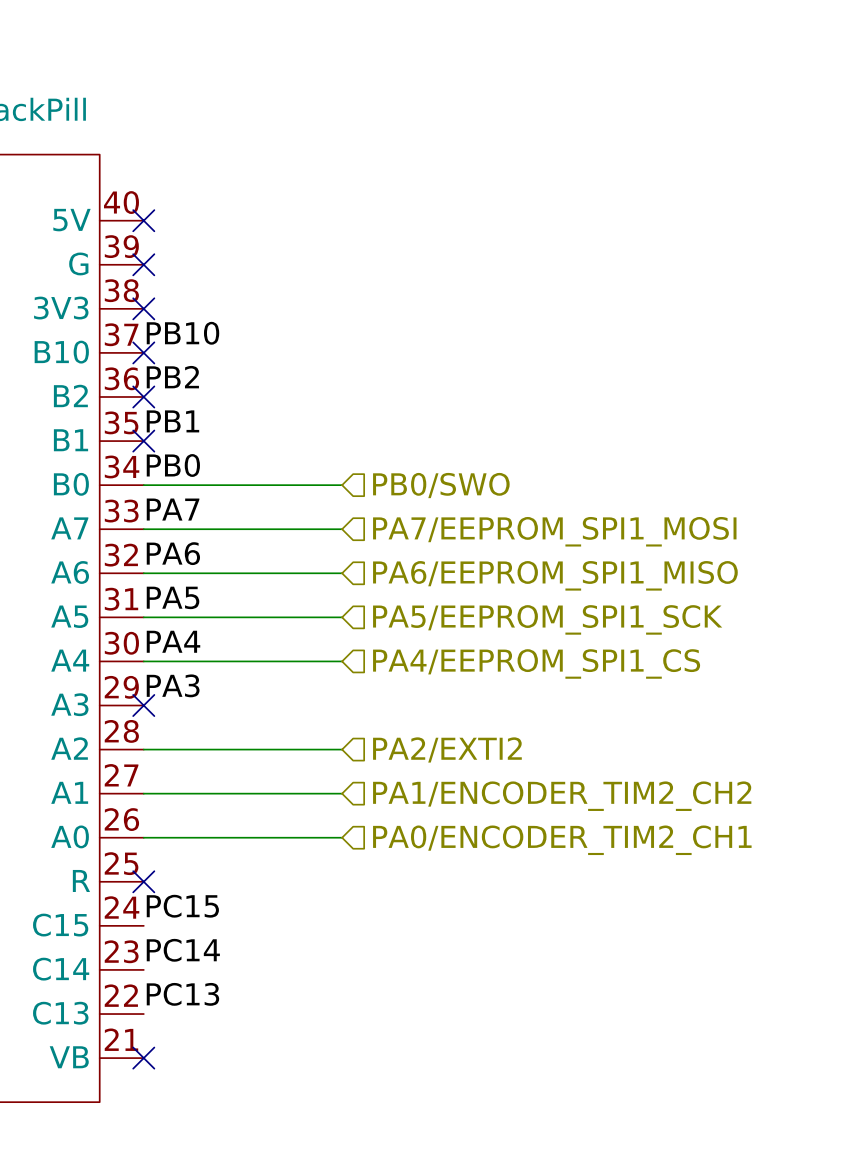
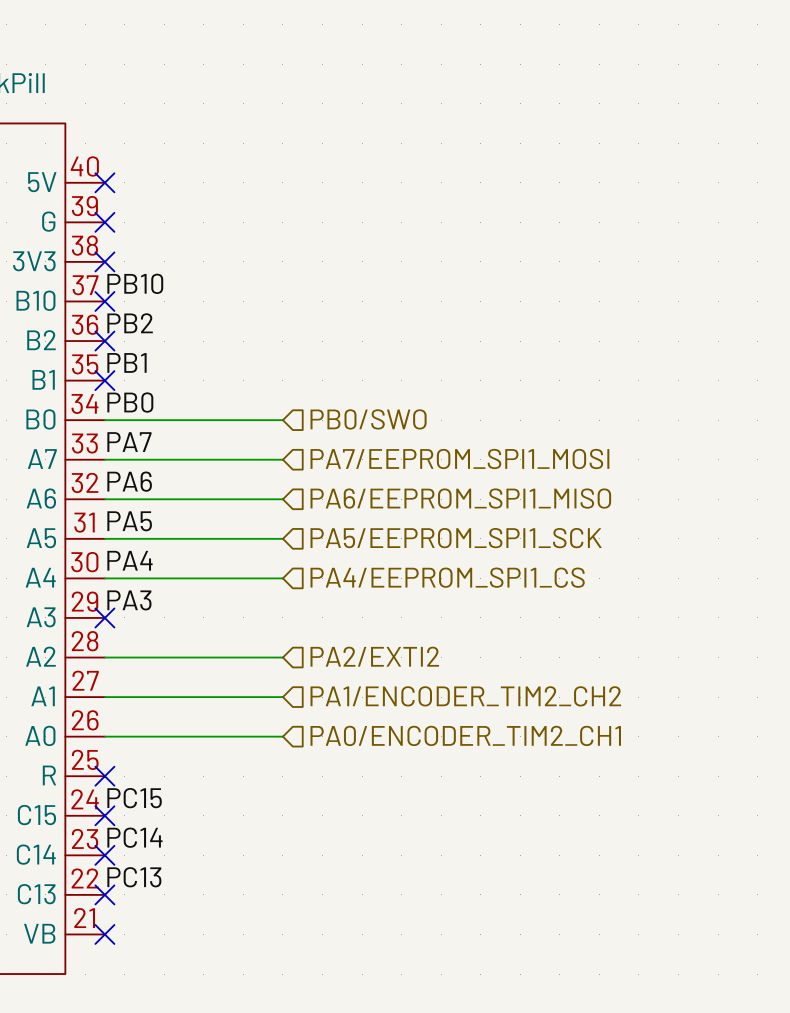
no-connect mark: none -> (104, 815)
no-connect mark: none -> (104, 855)
no-connect mark: none -> (104, 894)

